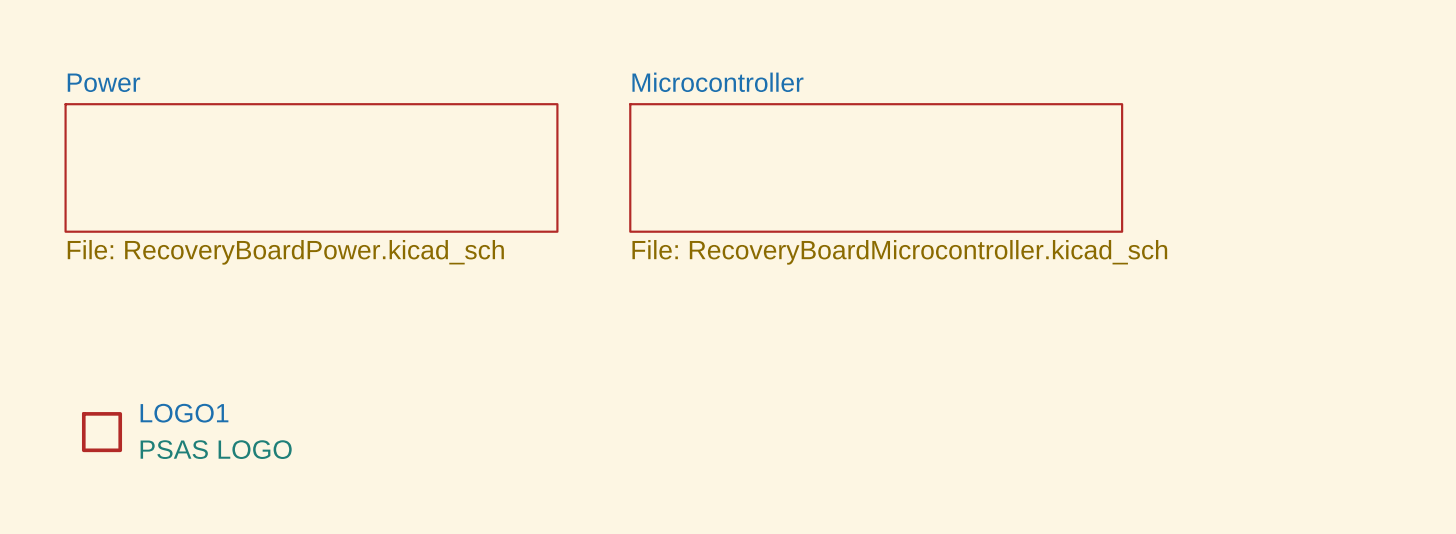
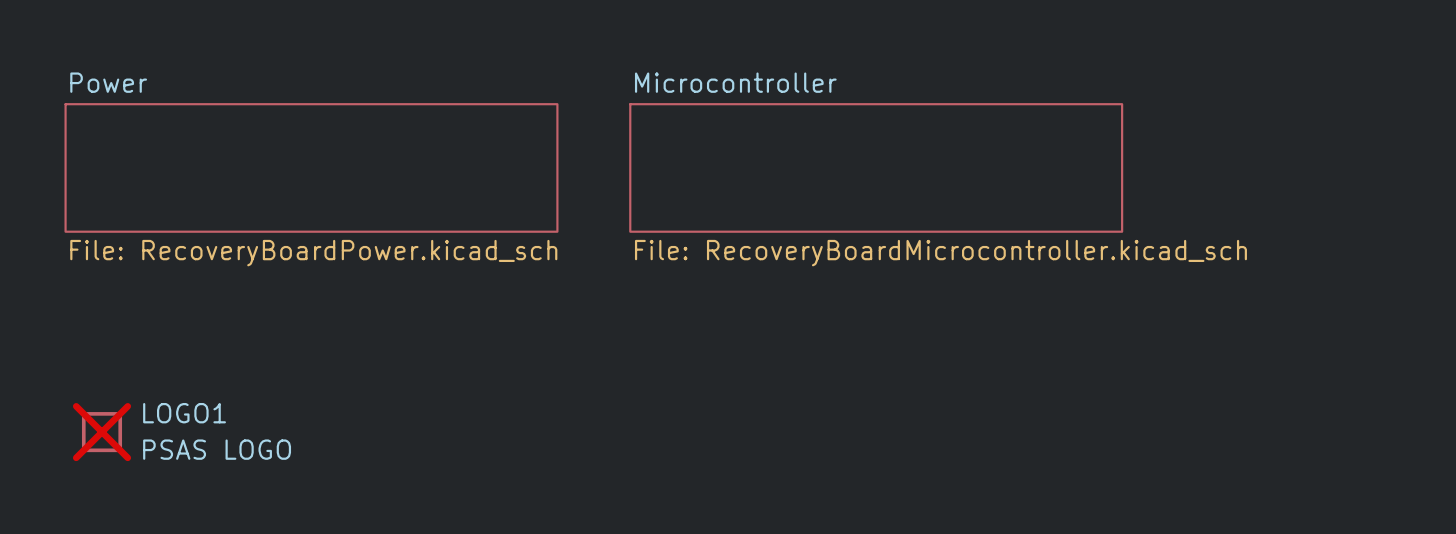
LOGO1 do-not-place cross: none -> (102, 432)

